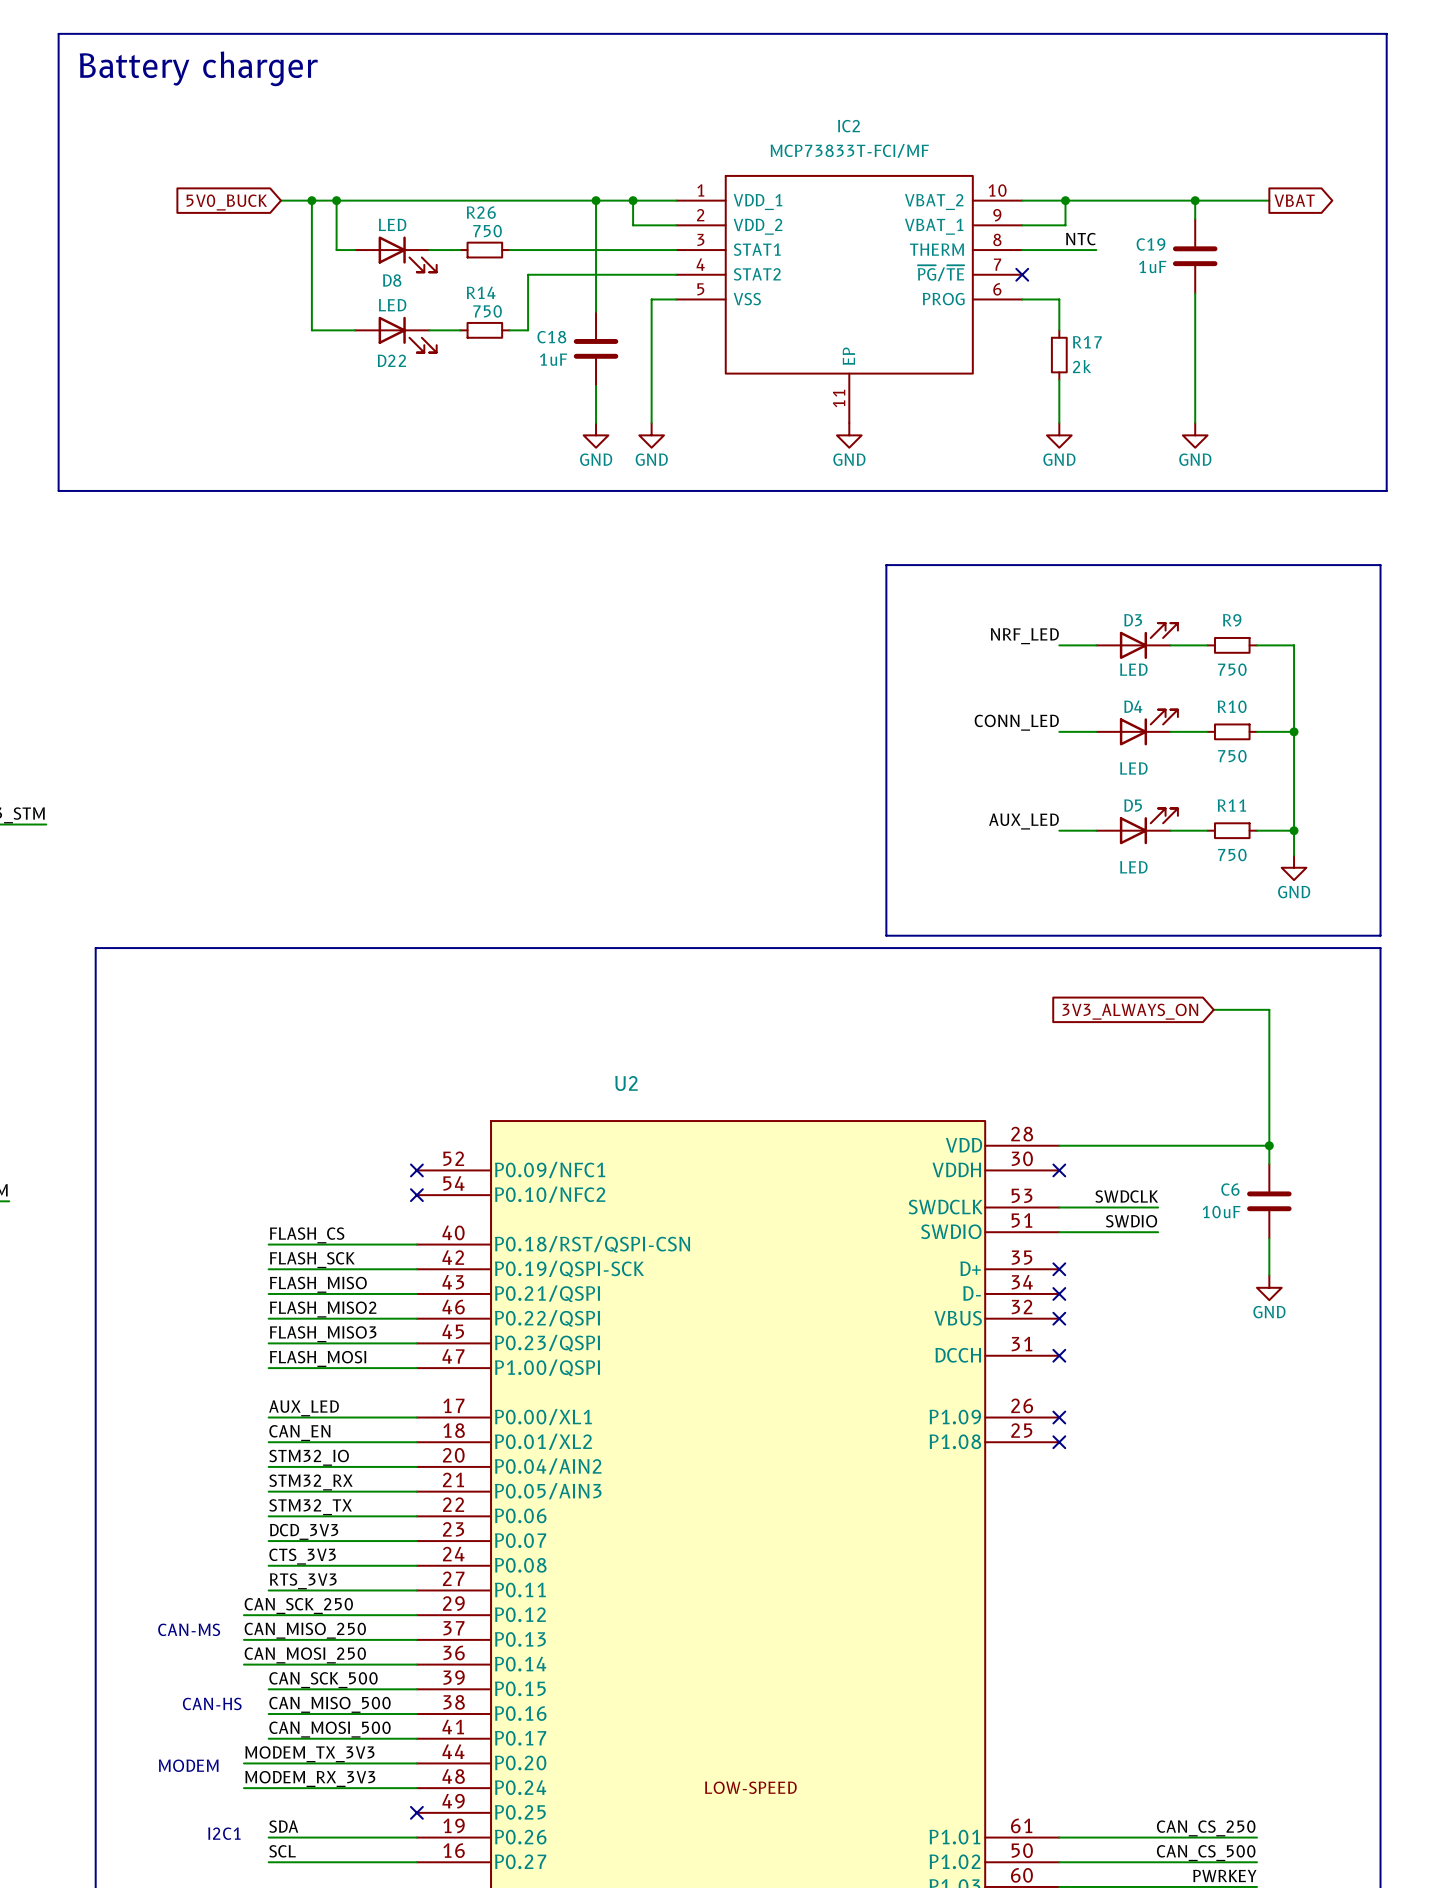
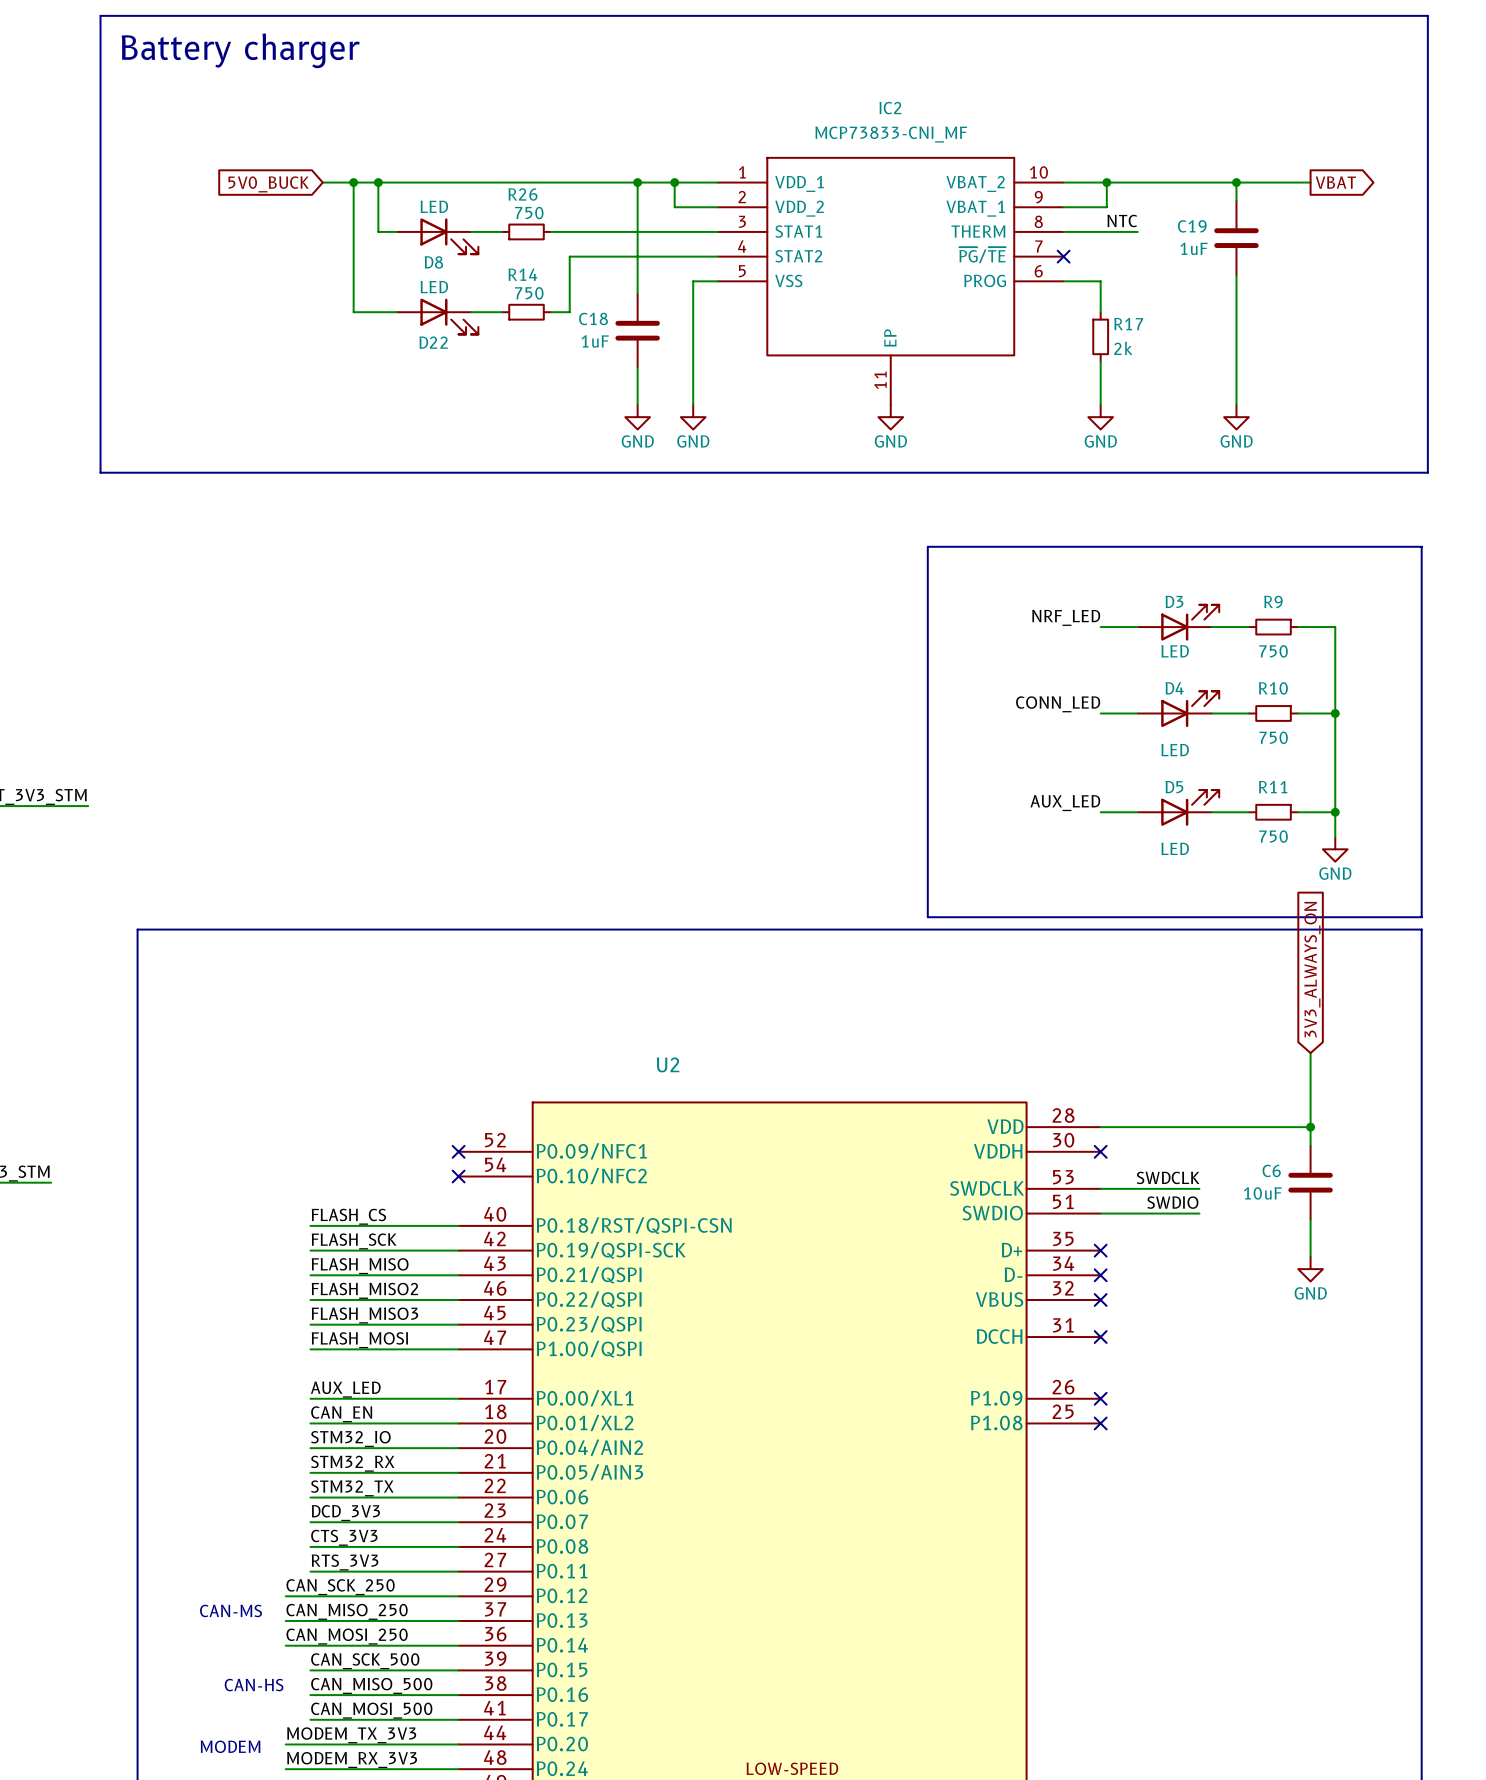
IC2 value: MCP73833T-FCI/MF (849, 150) -> MCP73833-CNI_MF (891, 134)
wire: (1213, 1009) (1269, 1009) (1269, 1071) -> none
global label rotation: 0° (1130, 1011) -> 90° clockwise (1312, 969)

